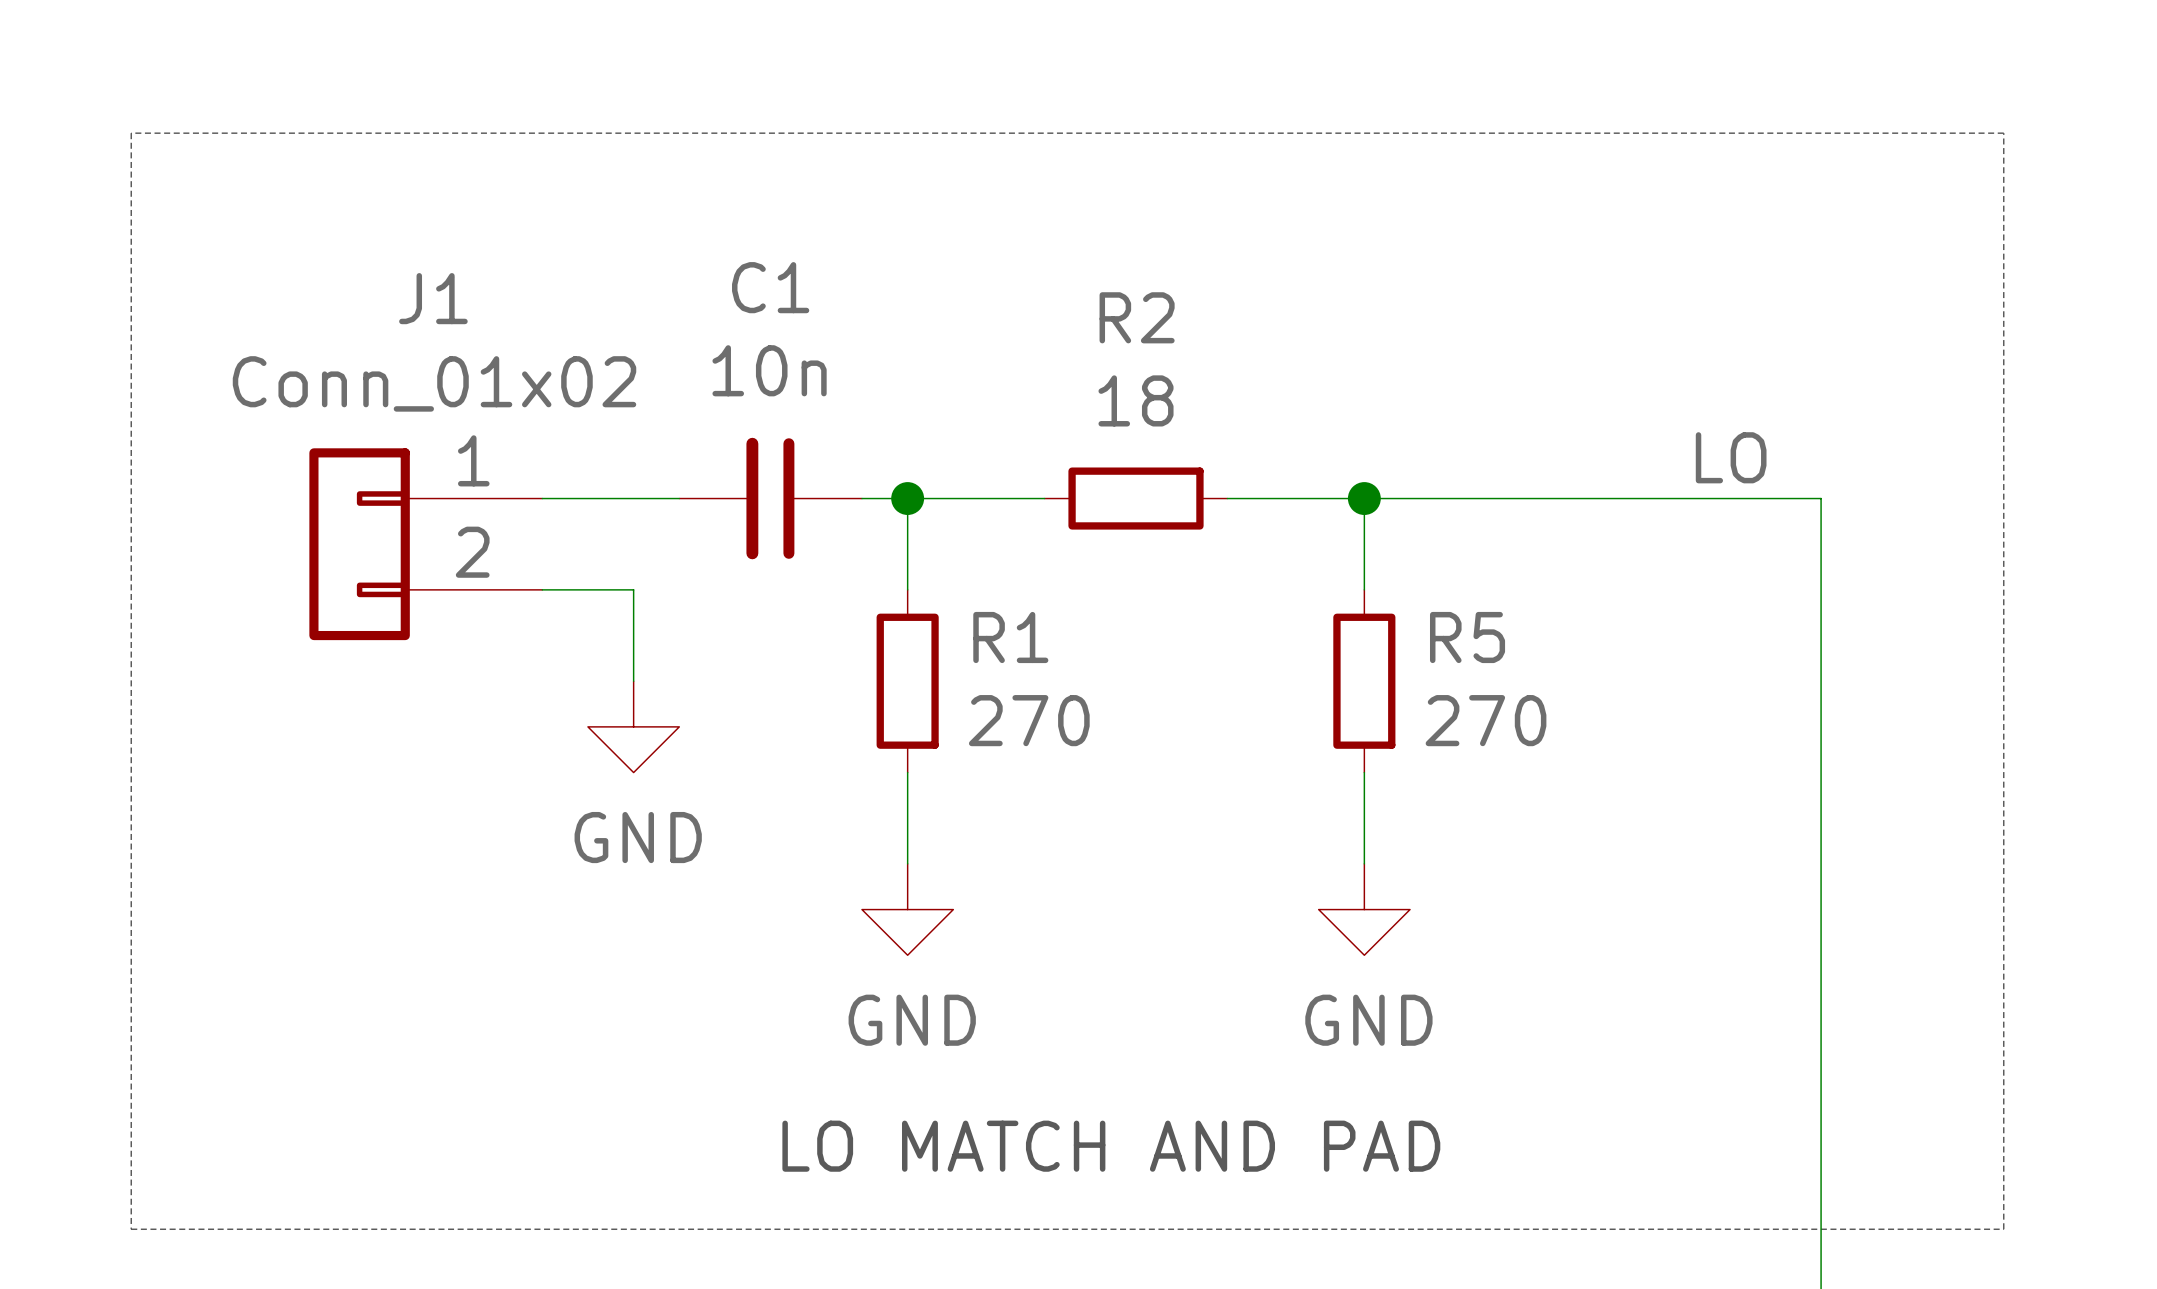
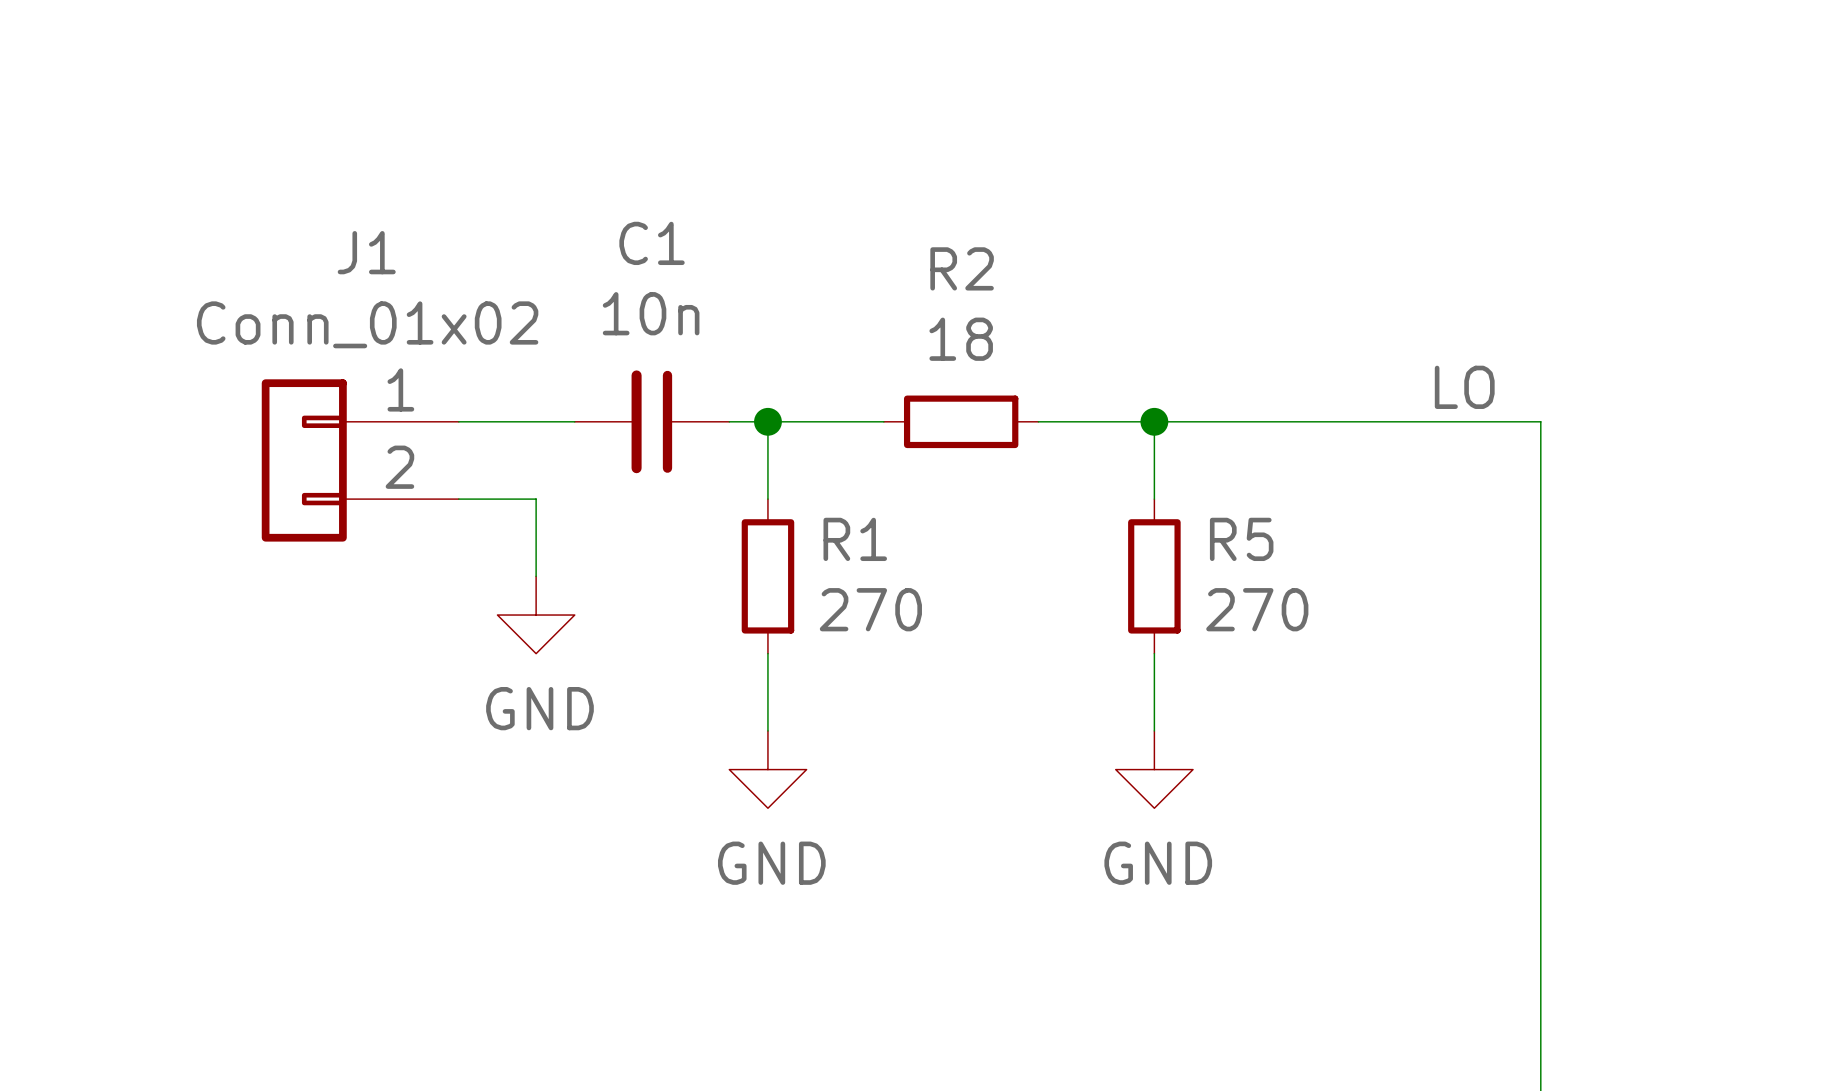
line: (131, 133) (131, 1229) (2003, 1229) (2003, 133) (131, 133) -> none
text: LO MATCH AND PAD (1111, 1146) -> none

